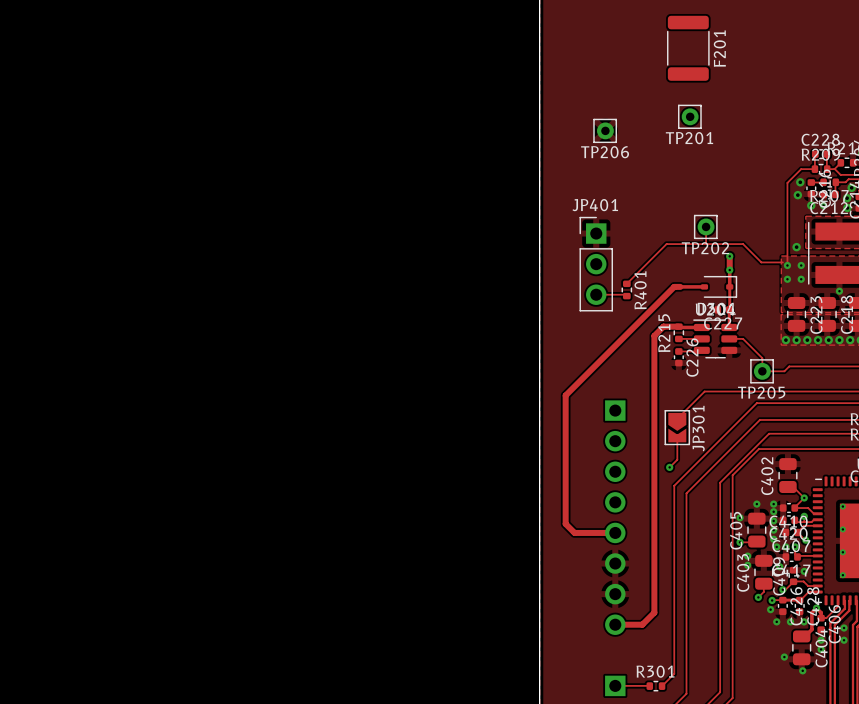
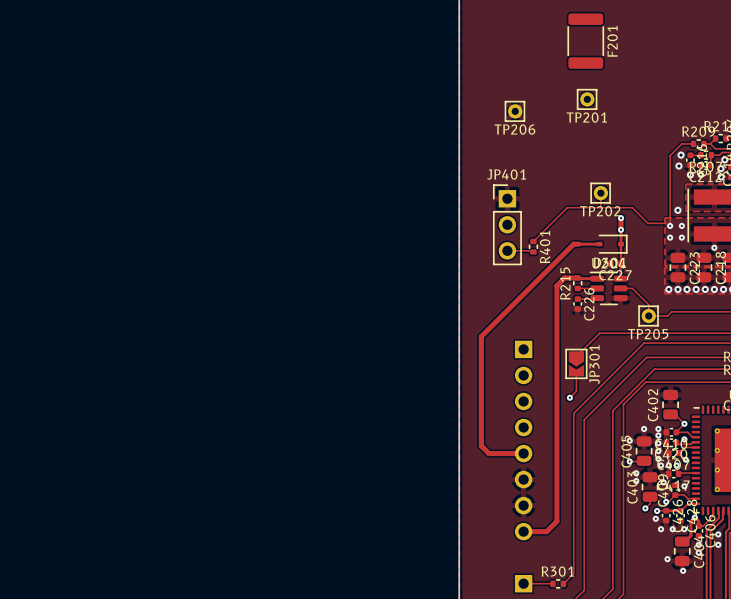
track: (815, 154) (814, 169) -> none
C228: (821, 154) -> none
track: (826, 154) (827, 169) -> none

